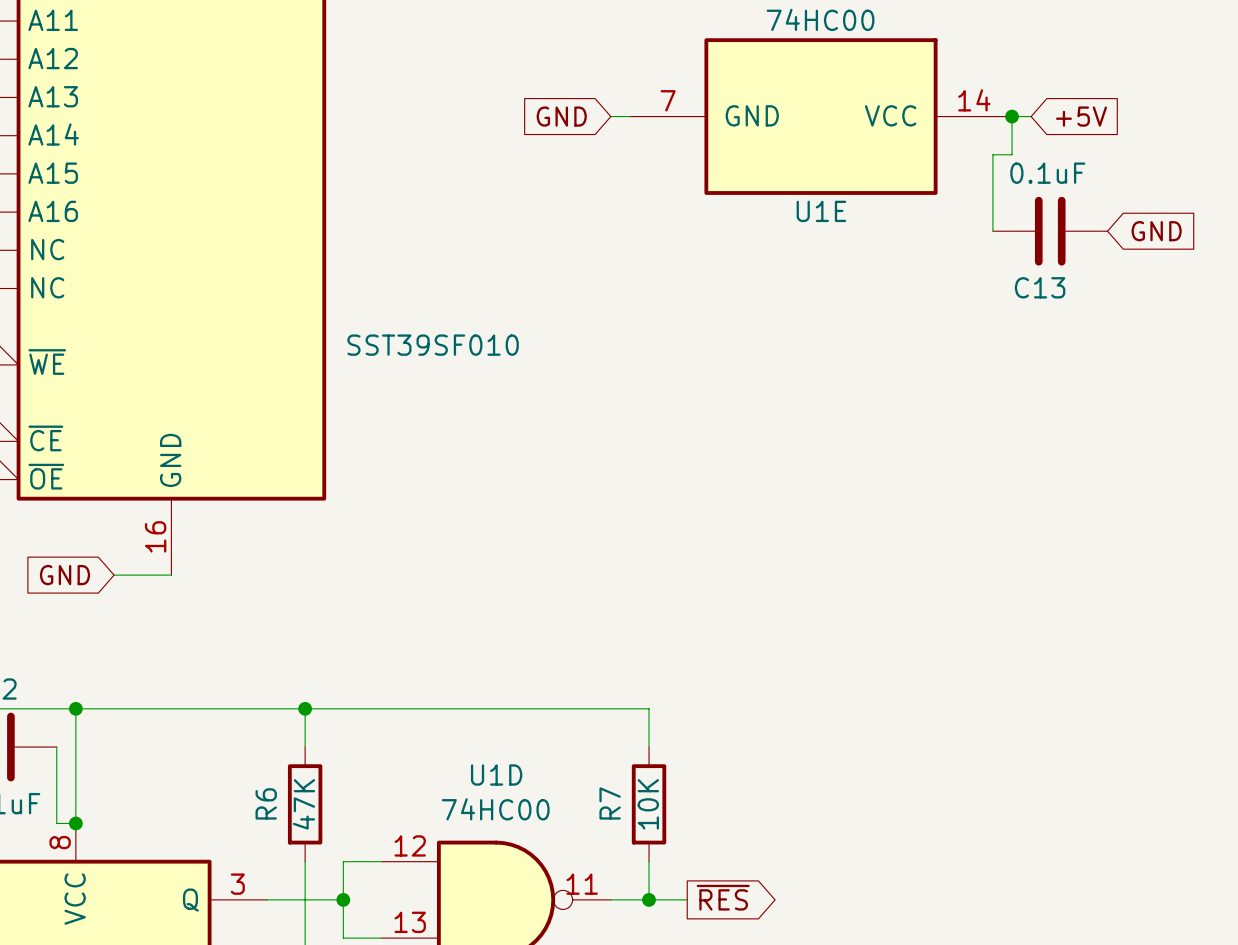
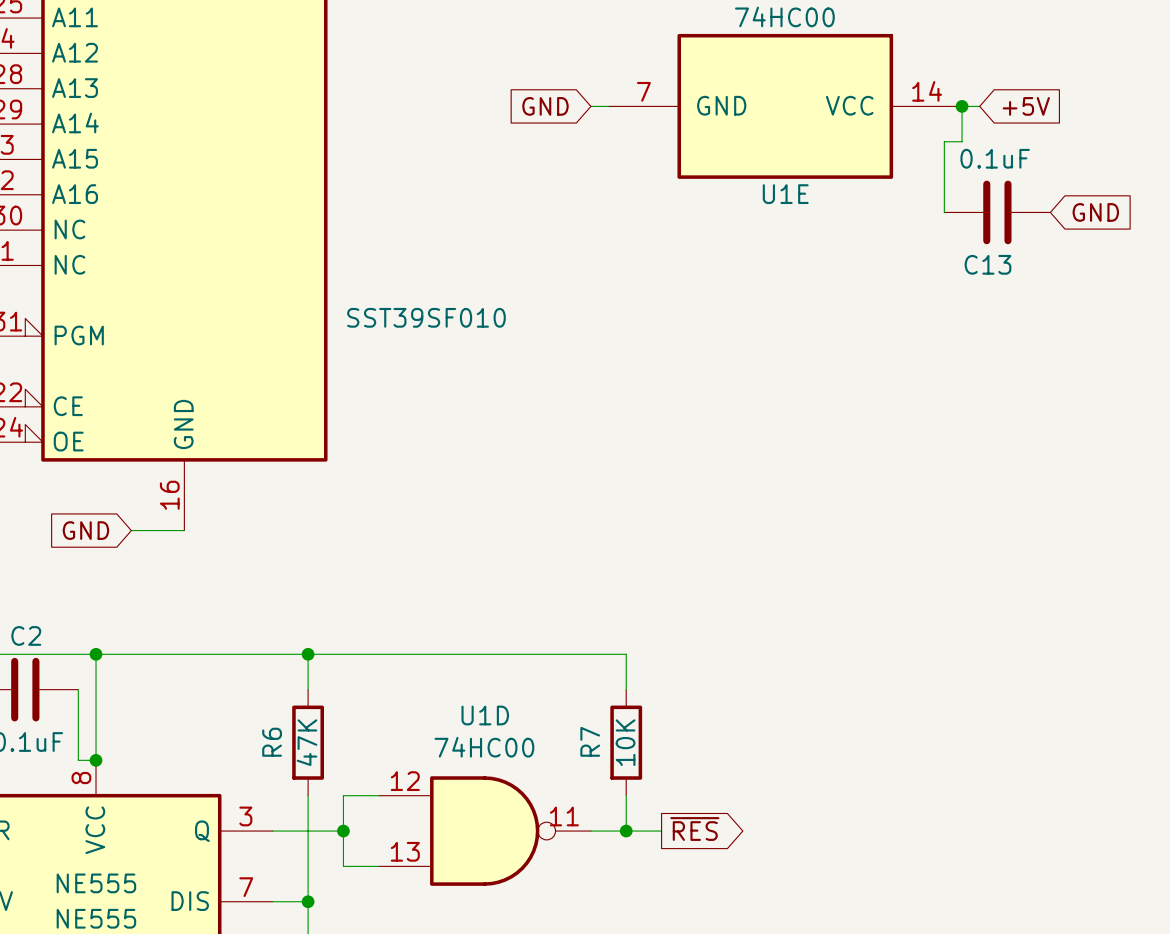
part pin name: ~{WE} (47, 362) -> PGM (79, 335)
part pin name: ~{CE} (45, 438) -> CE (68, 406)
part pin name: ~{OE} (46, 476) -> OE (68, 441)

